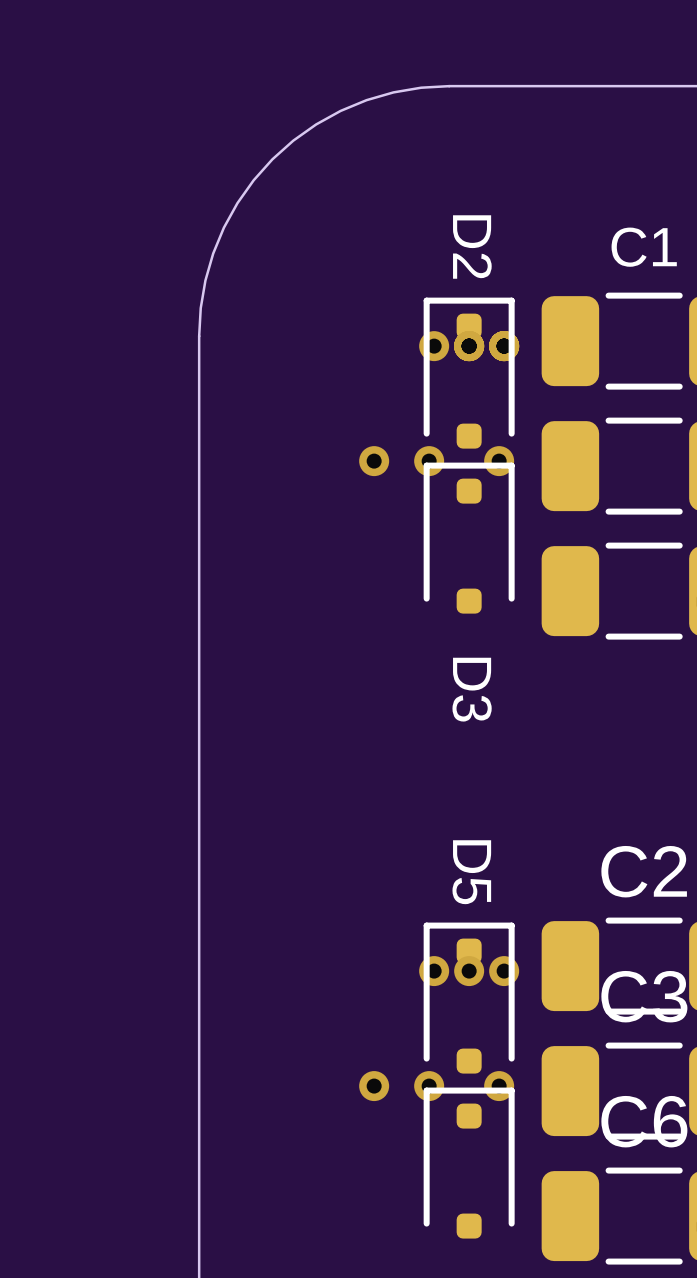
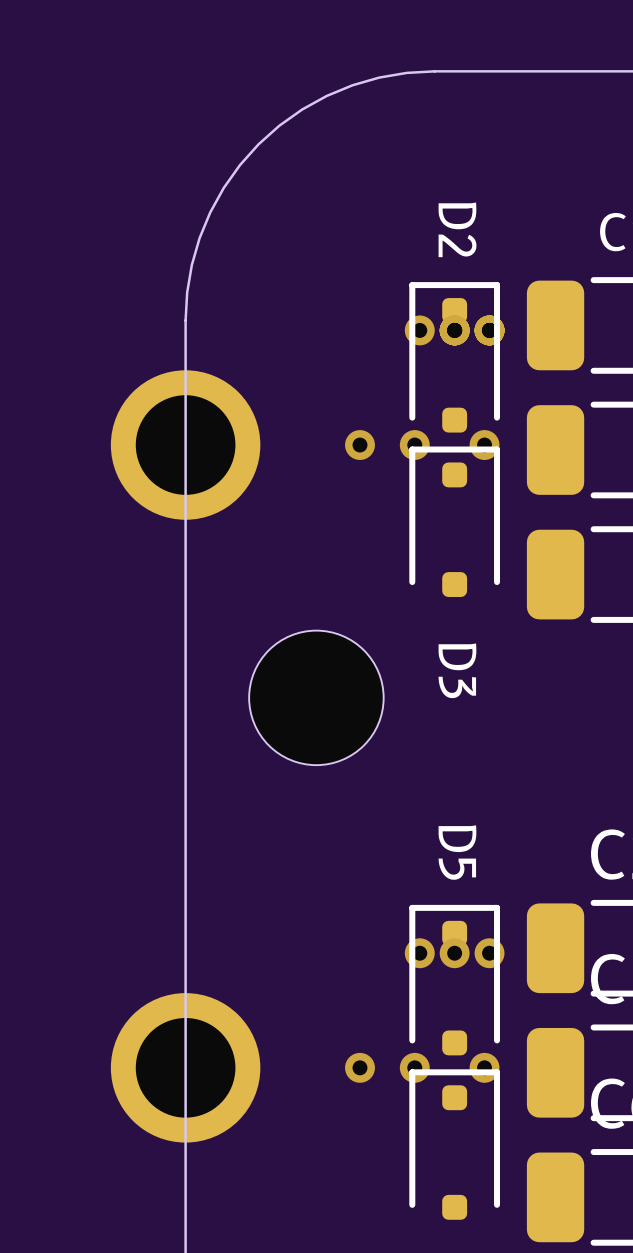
part: none -> (185, 445)
part: none -> (316, 697)
part: none -> (185, 1067)

